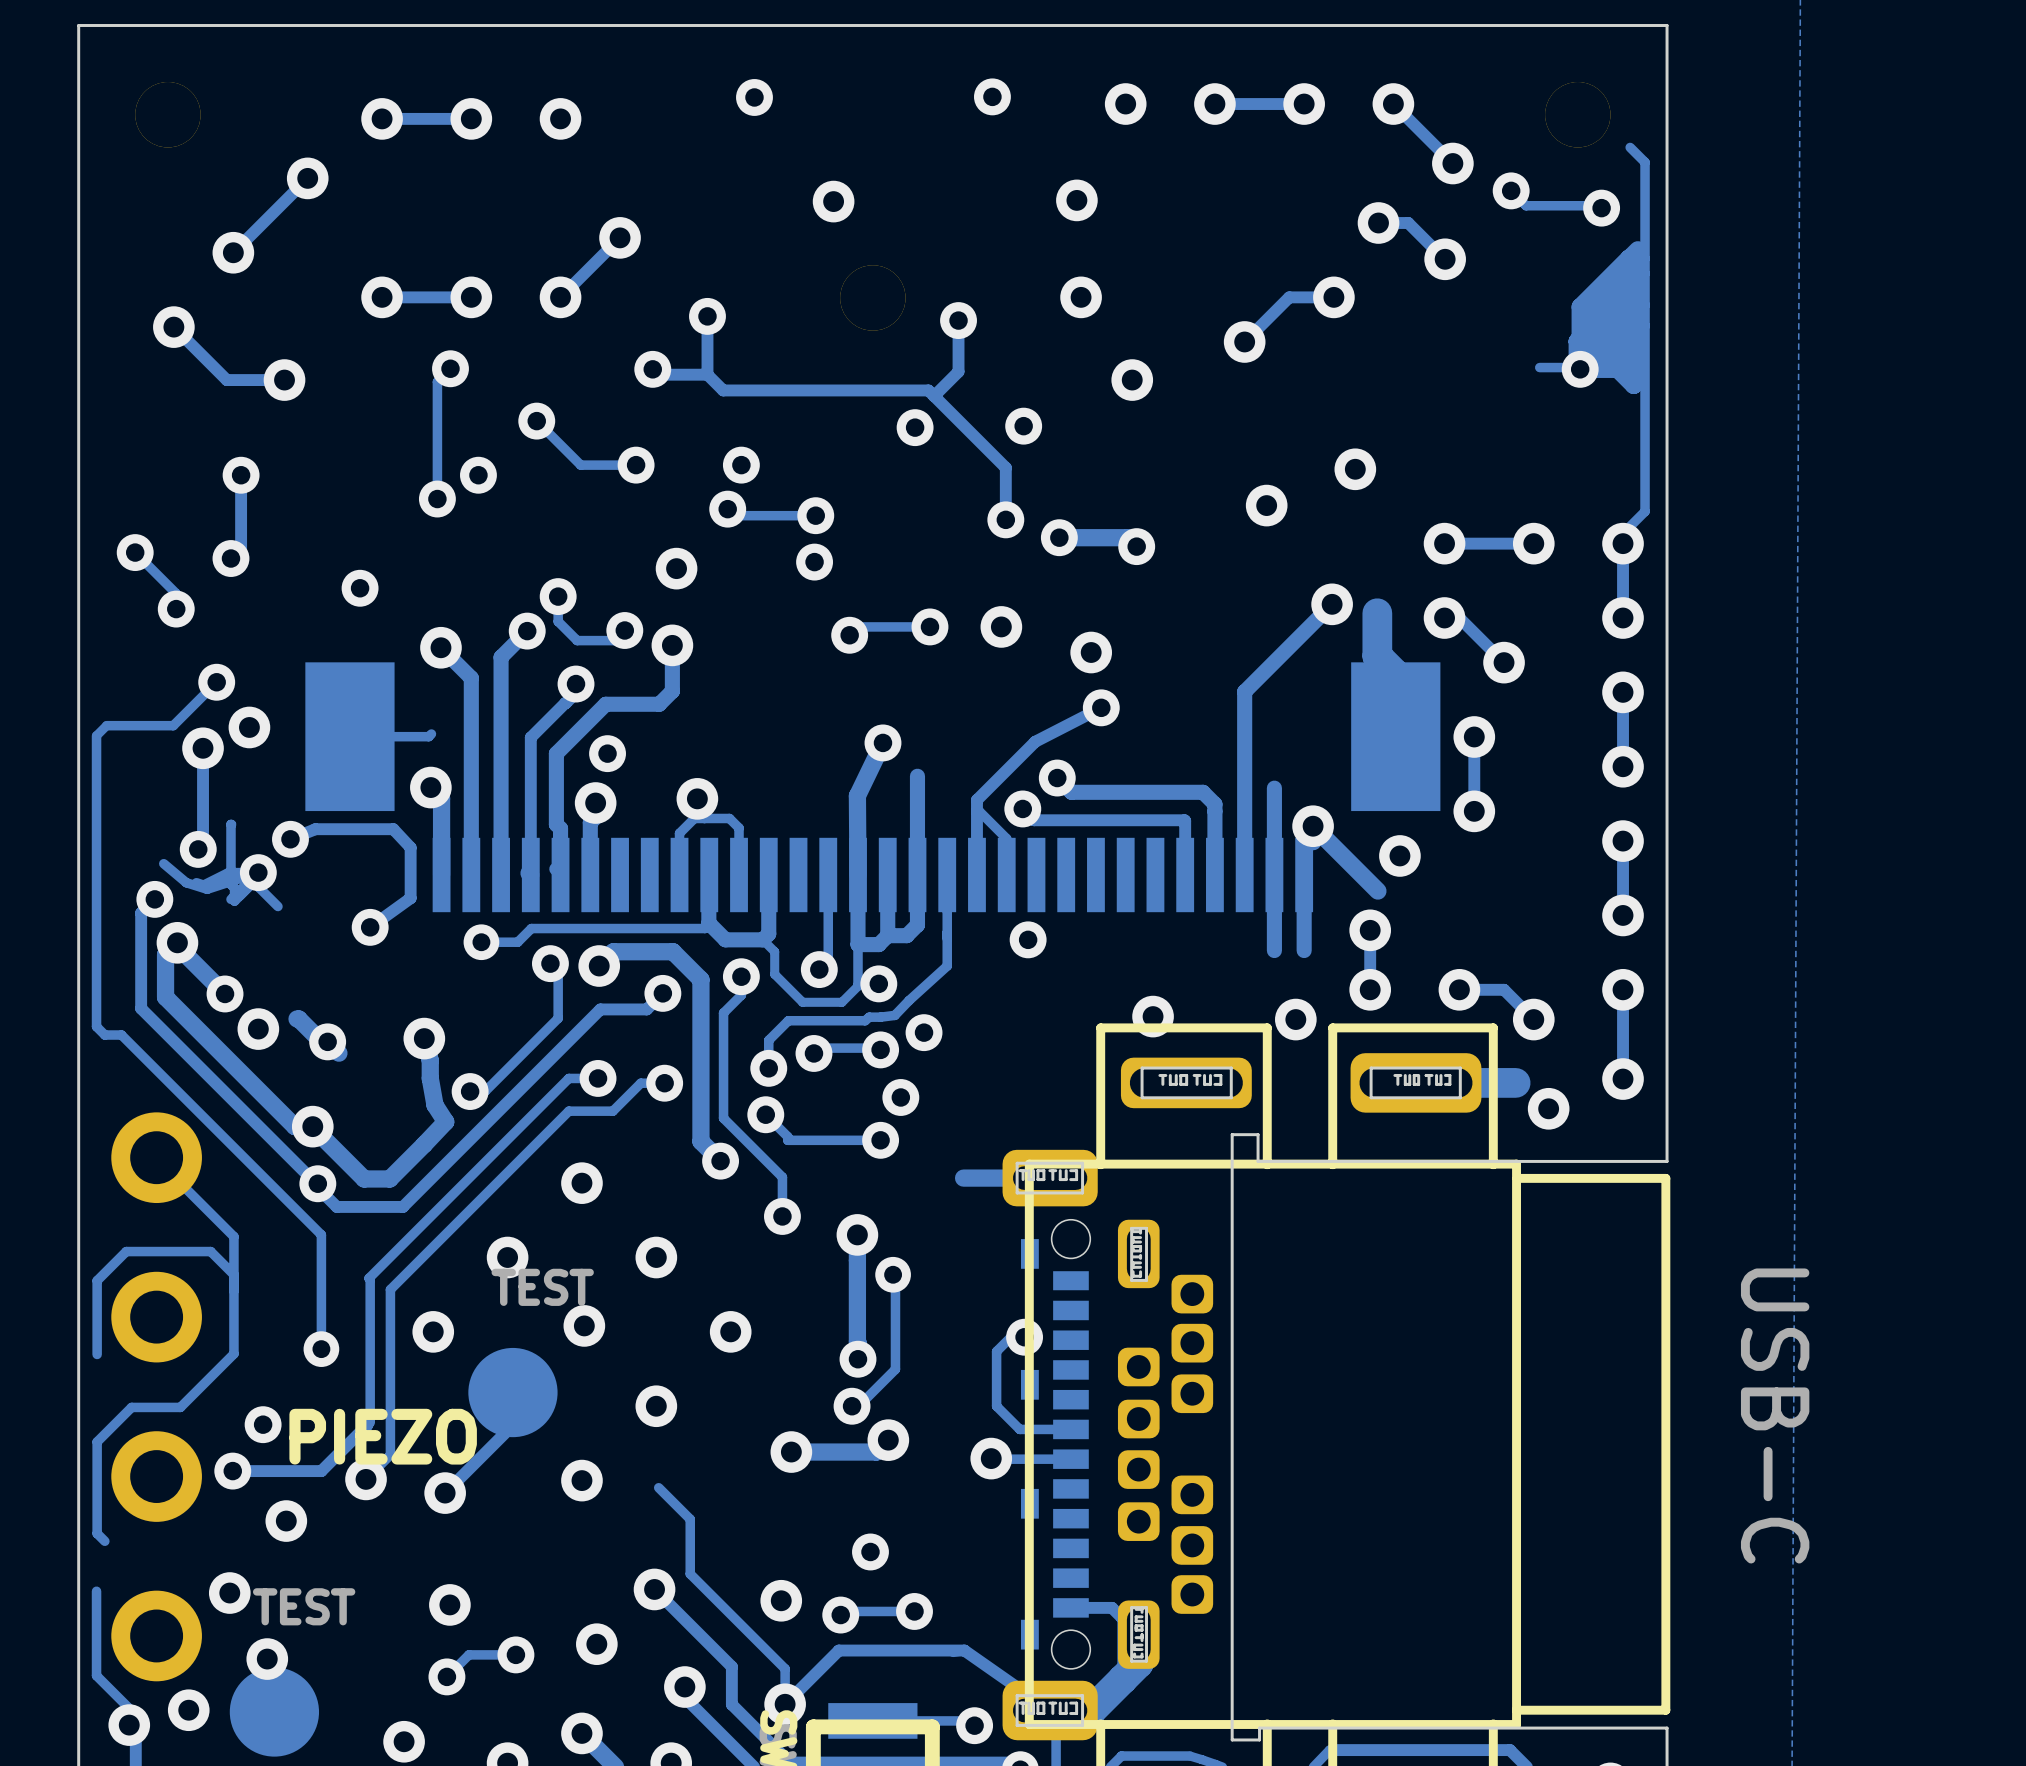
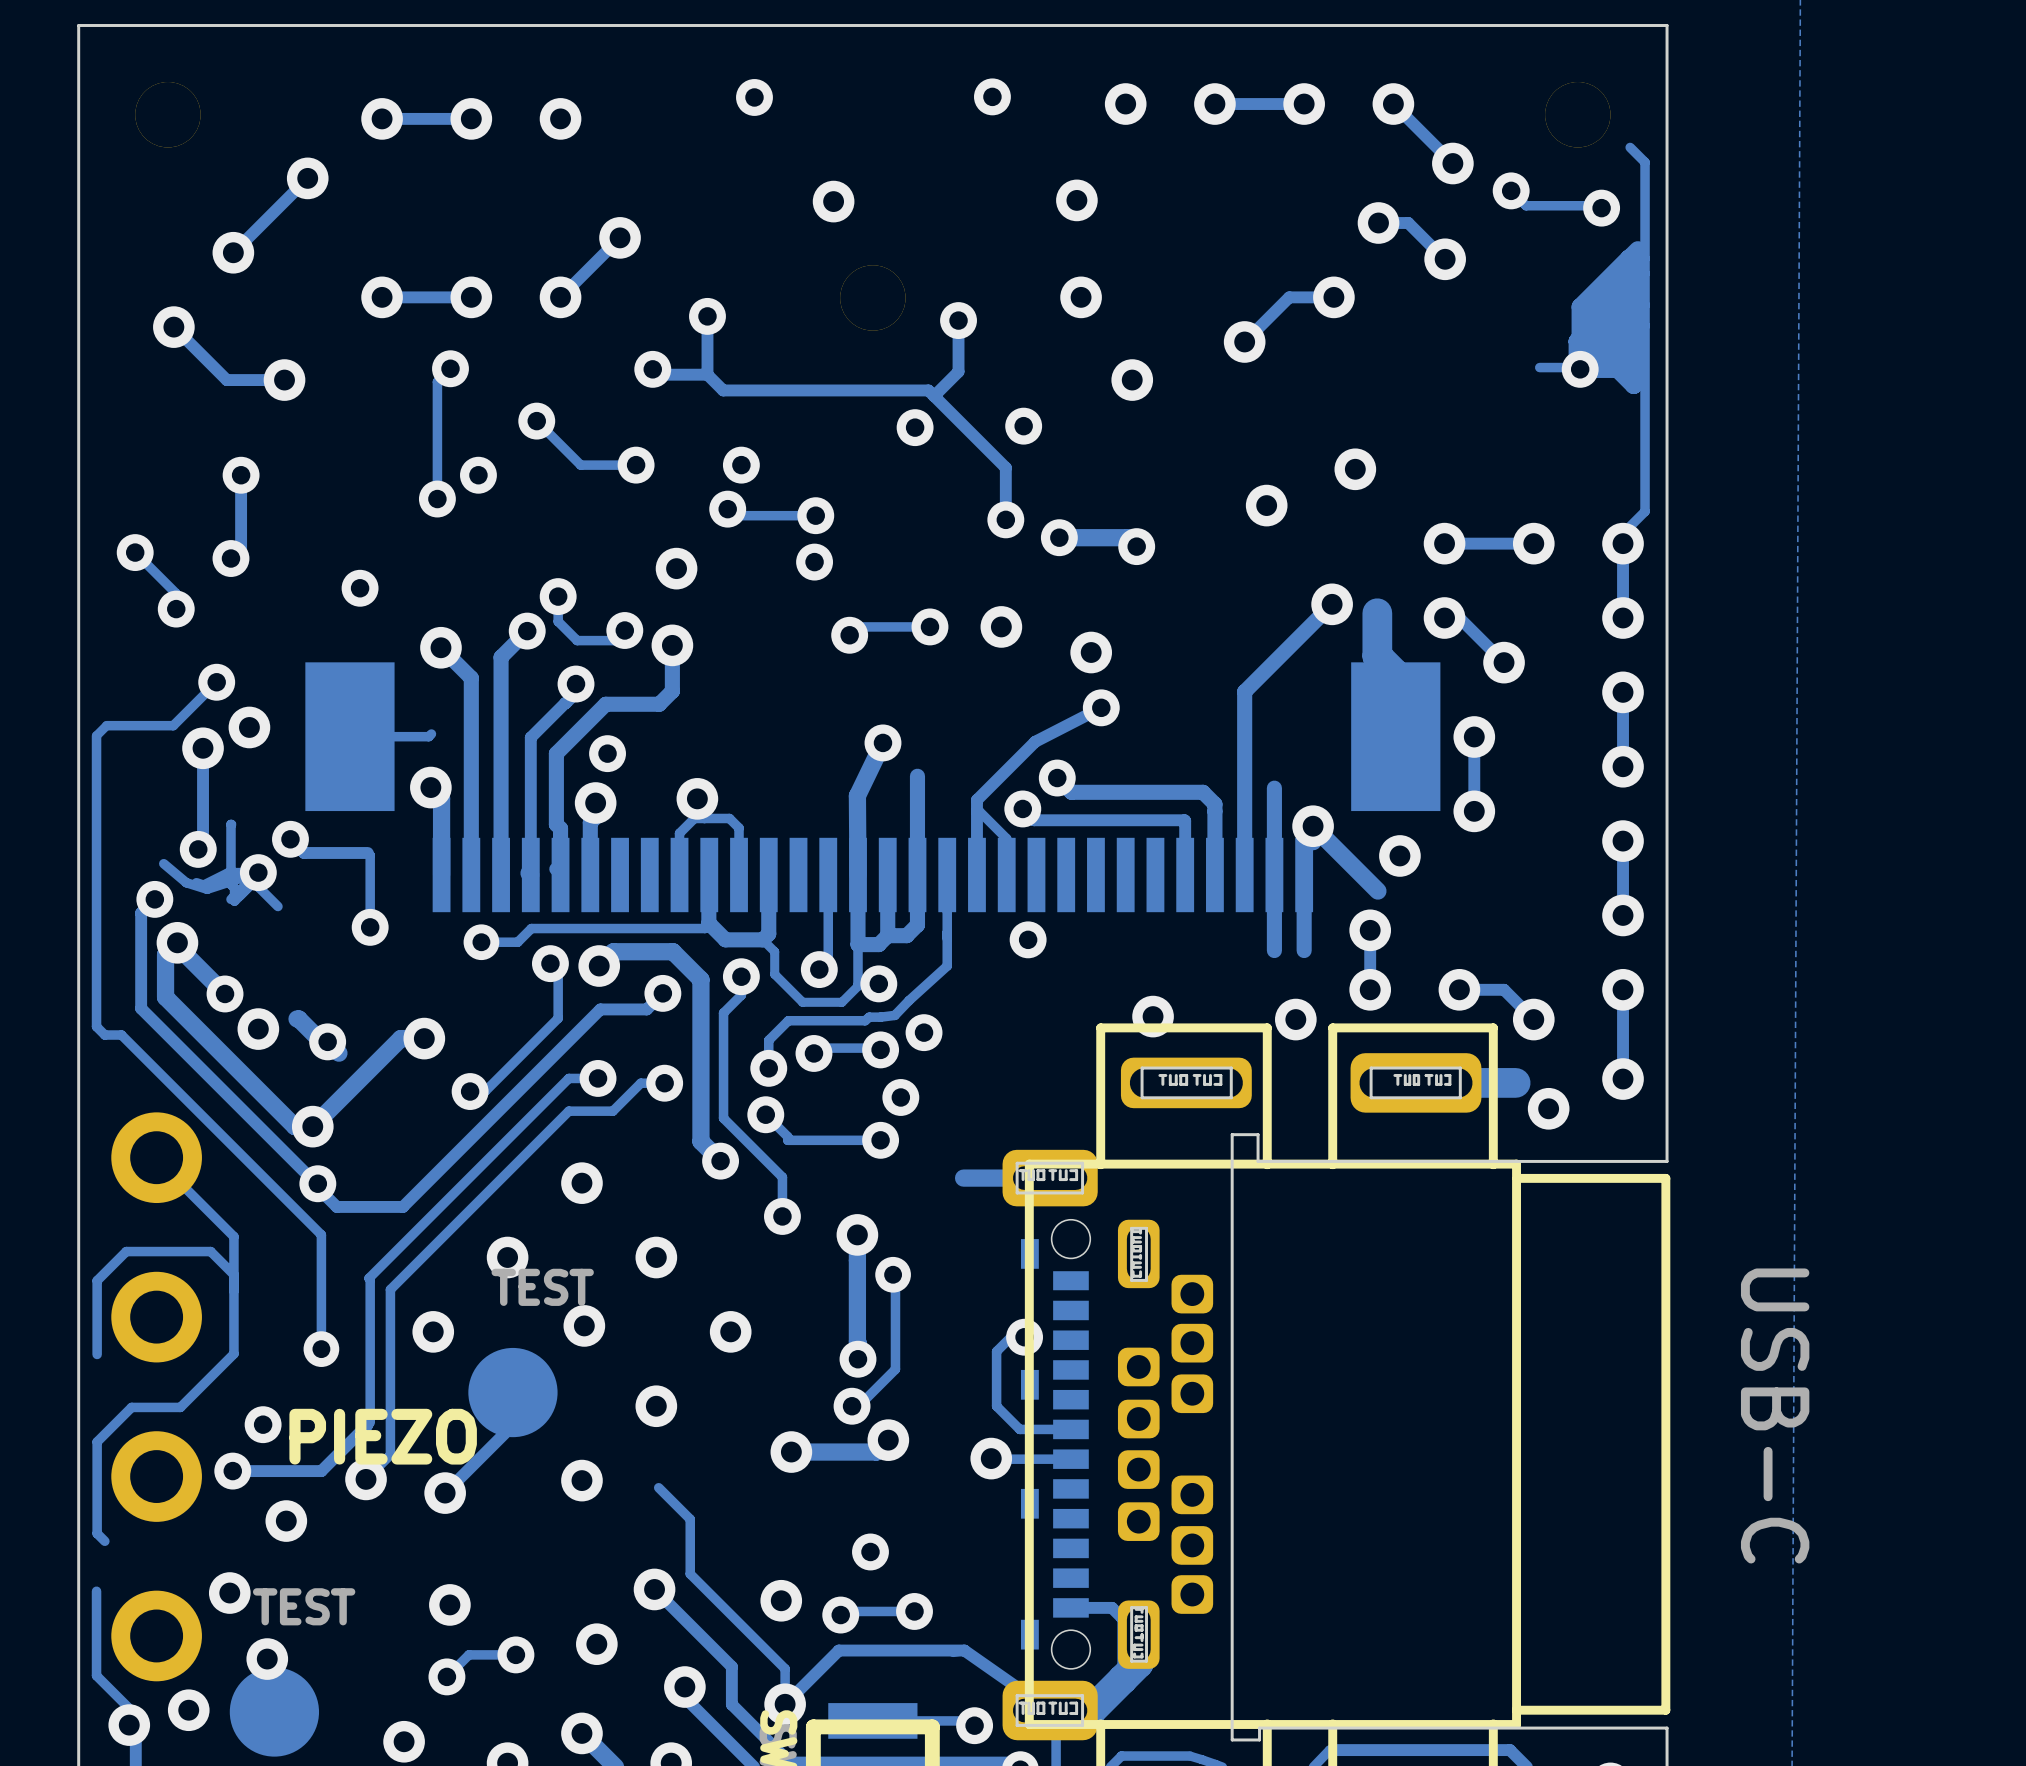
track: (290, 839) (315, 829) (393, 829) (410, 847) (410, 898) (370, 927) -> (290, 839) (304, 852) (367, 852) (370, 855) (370, 927)
track: (424, 1038) (430, 1060) (430, 1078) (435, 1105) (445, 1121) (389, 1178) (364, 1178) (312, 1127) -> (424, 1038) (400, 1038) (312, 1126)

